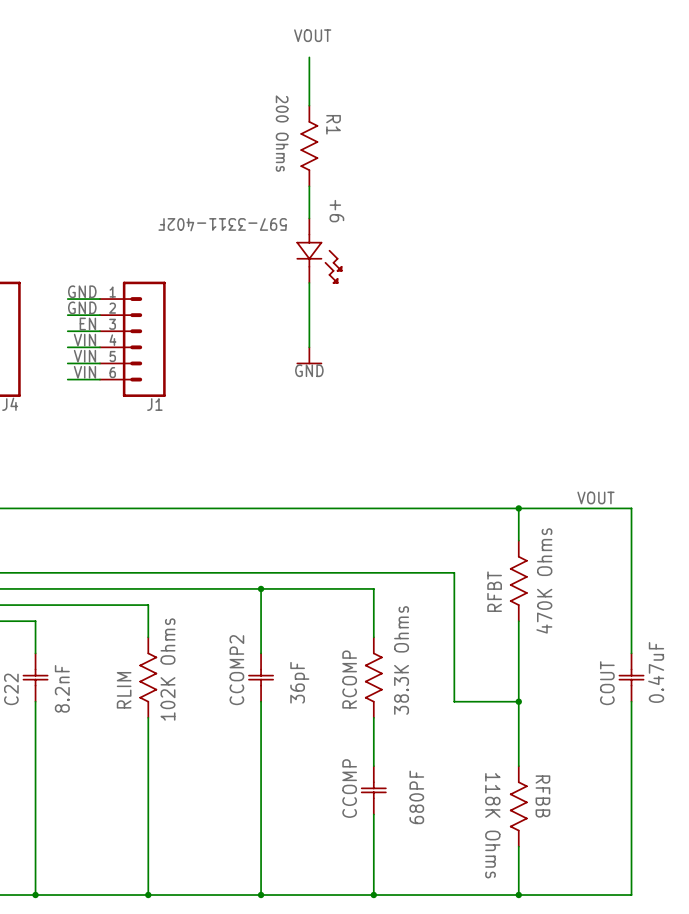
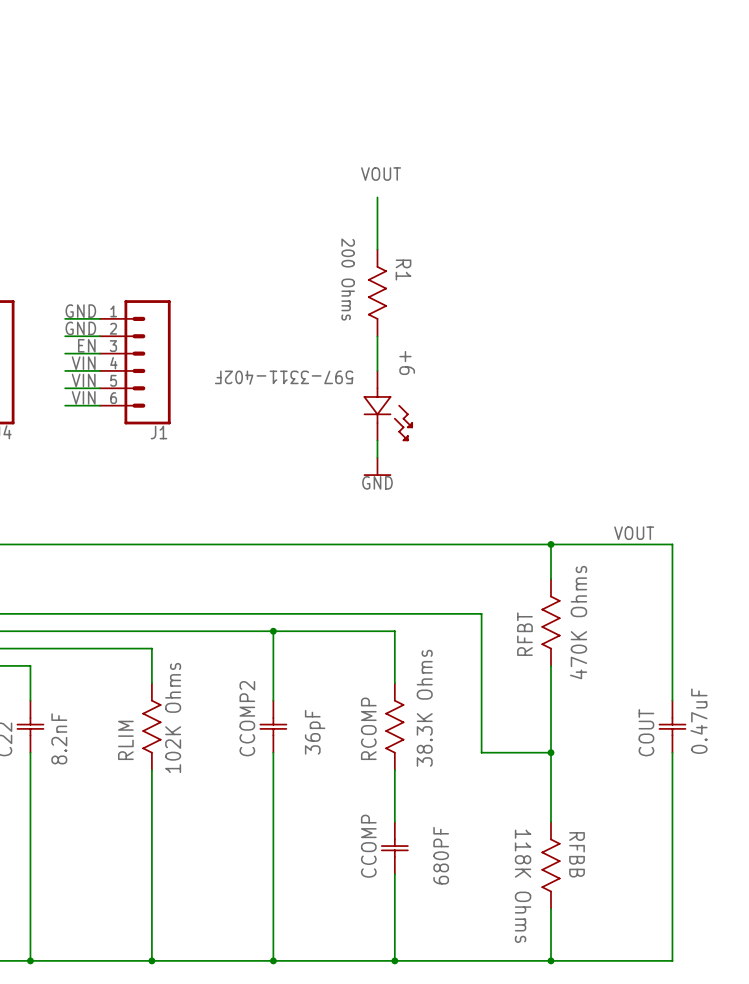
label position: VOUT (312, 35) -> VOUT (381, 174)
wire: (309, 57) (309, 105) -> (377, 197) (377, 249)
R1 position: (309, 146) -> (377, 292)
wire: (309, 186) (309, 218) -> (377, 336) (377, 370)
+6 position: (319, 251) -> (388, 406)
wire: (309, 282) (309, 347) -> none
power symbol position: GND (309, 355) -> GND (377, 466)
wire: none -> (377, 440) (377, 457)

